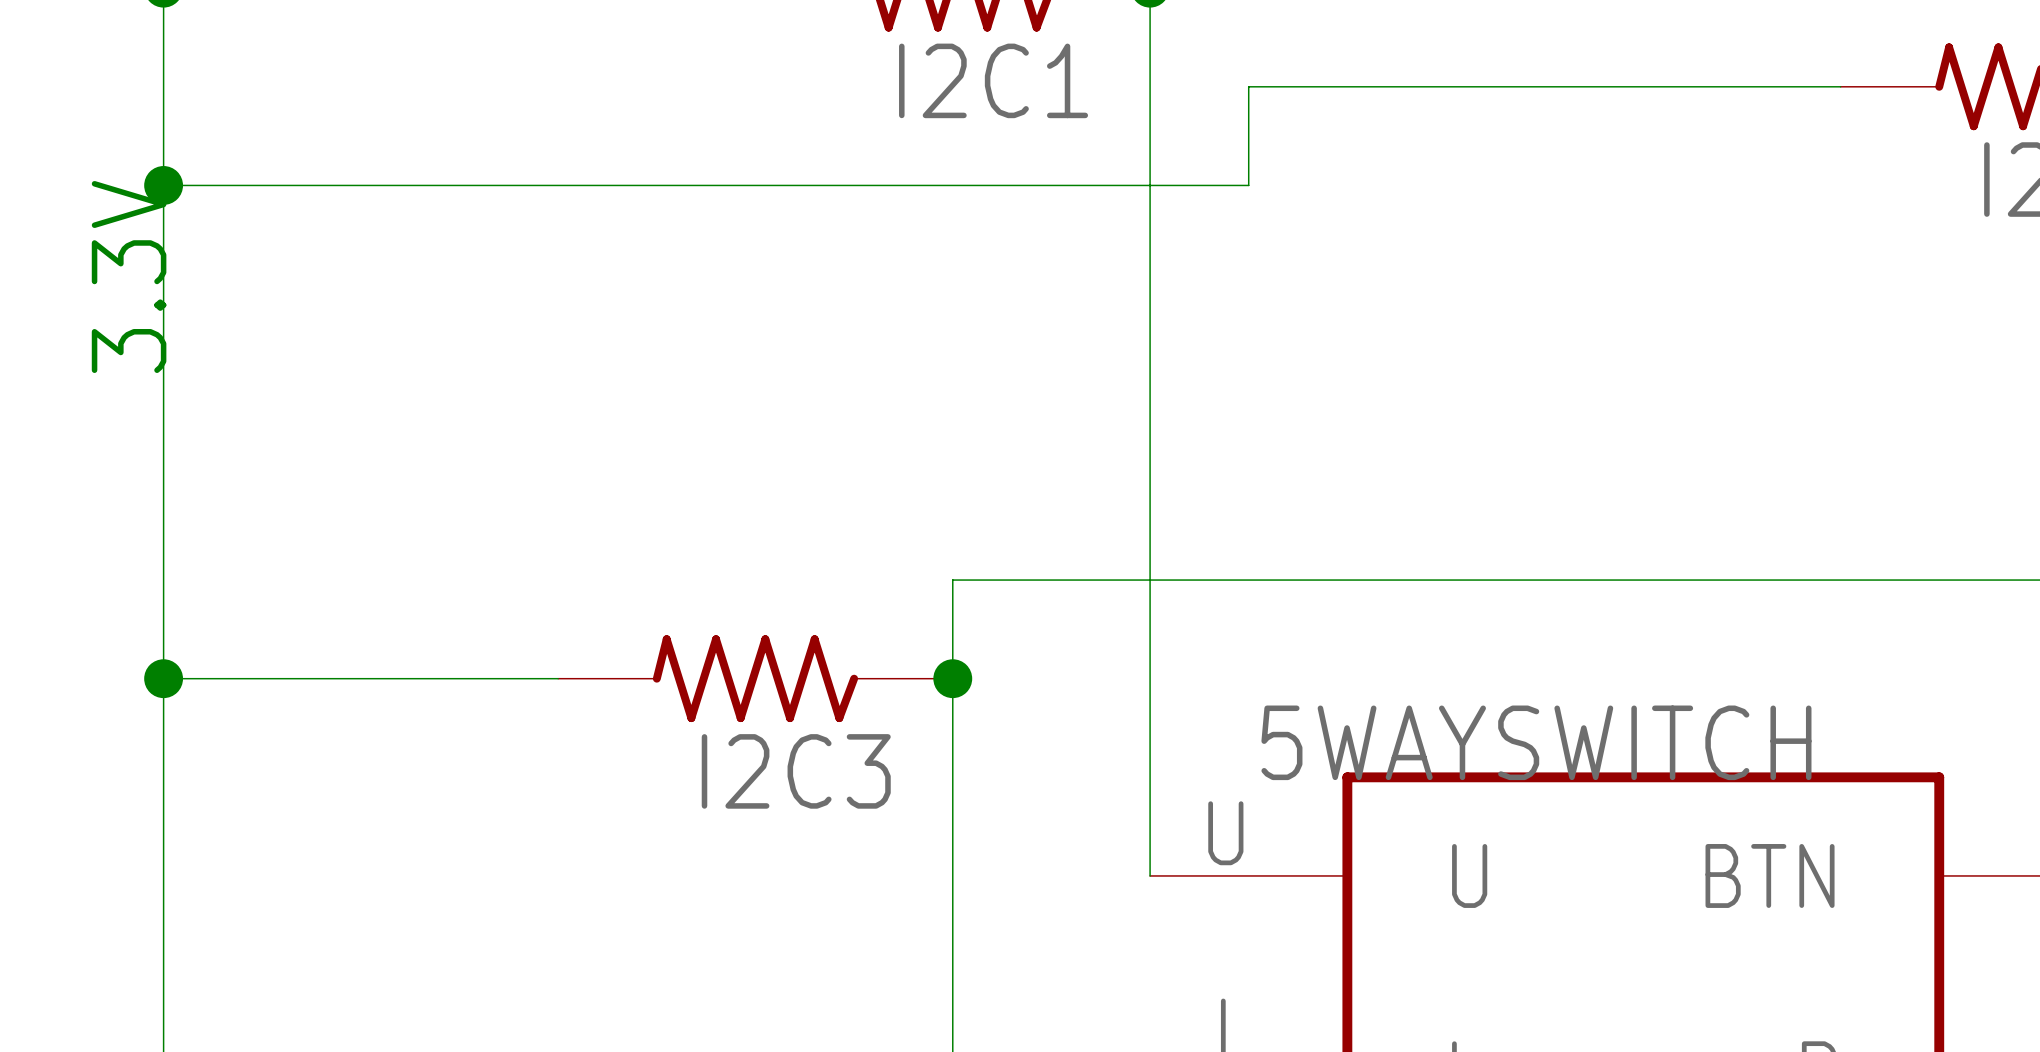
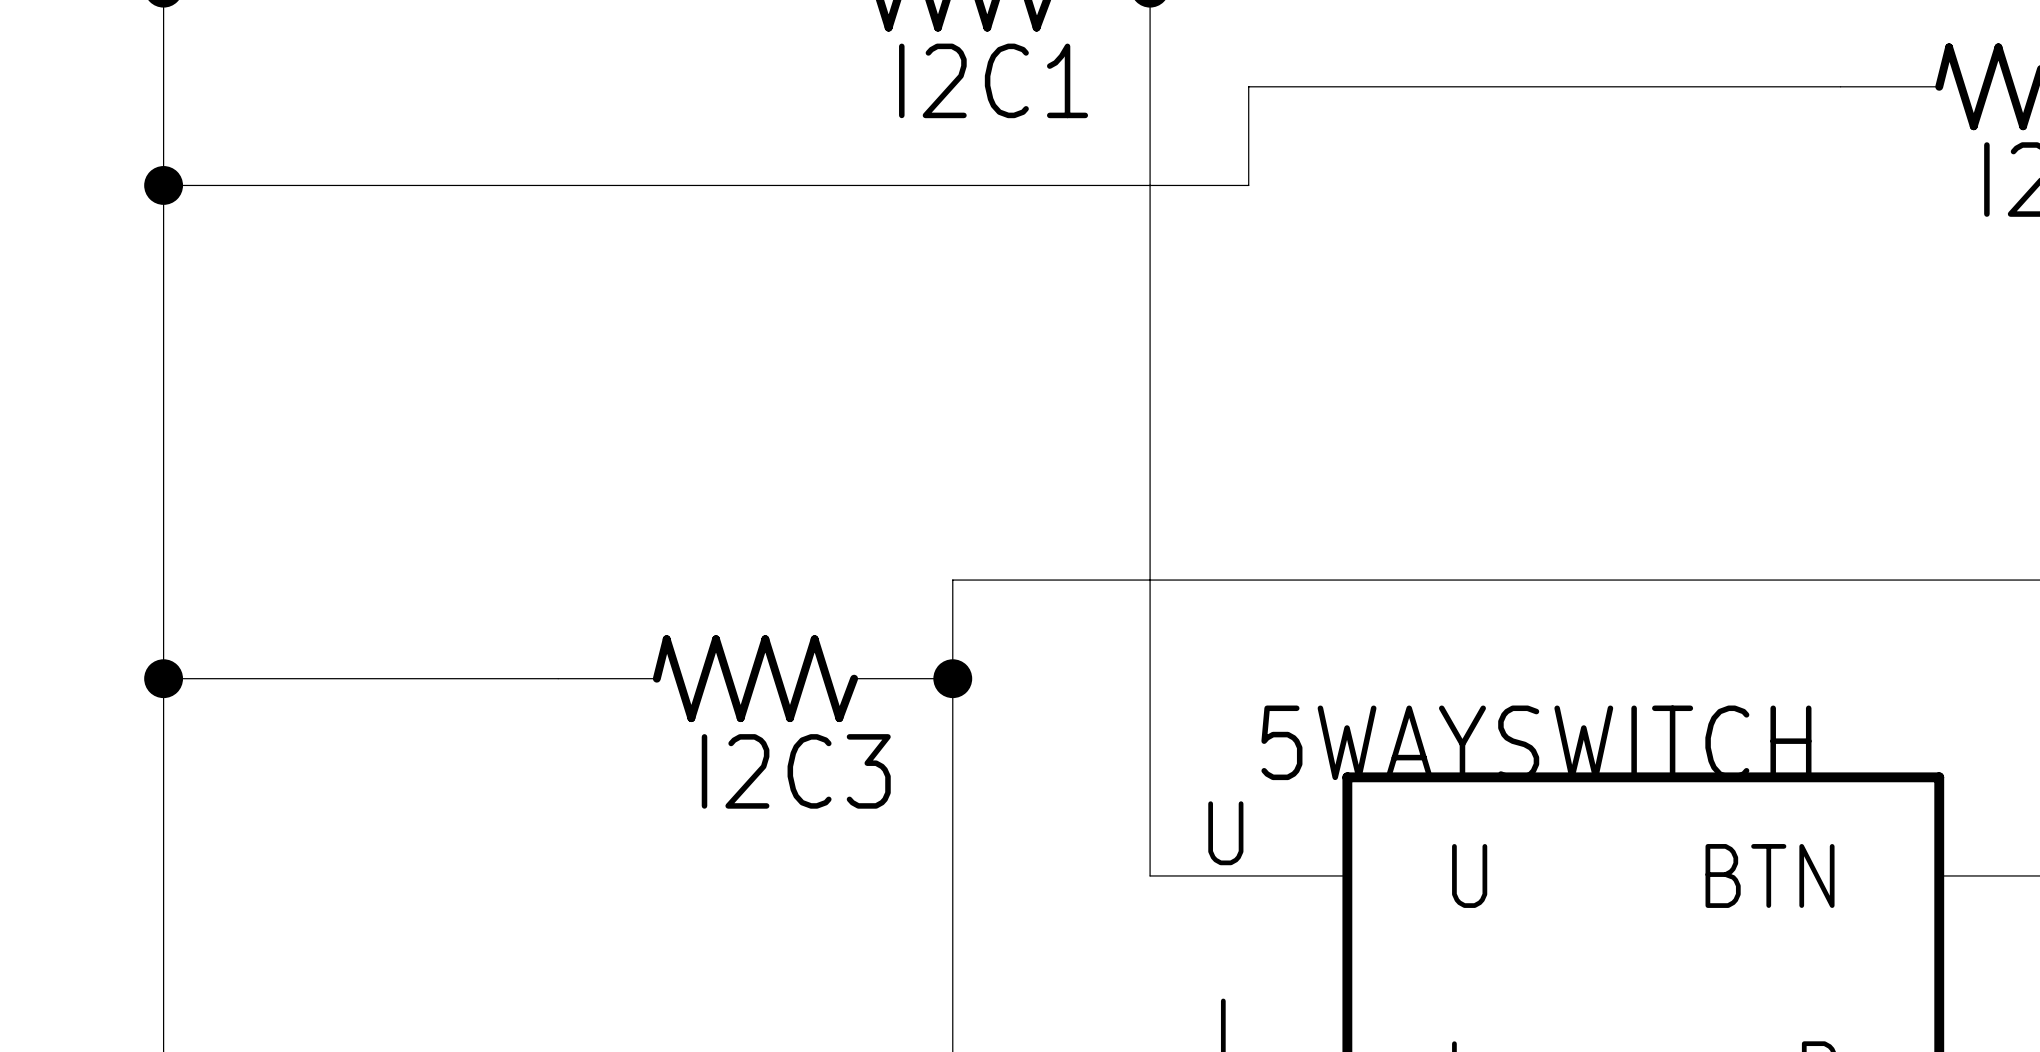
text: 3.3V (129, 277) -> none

